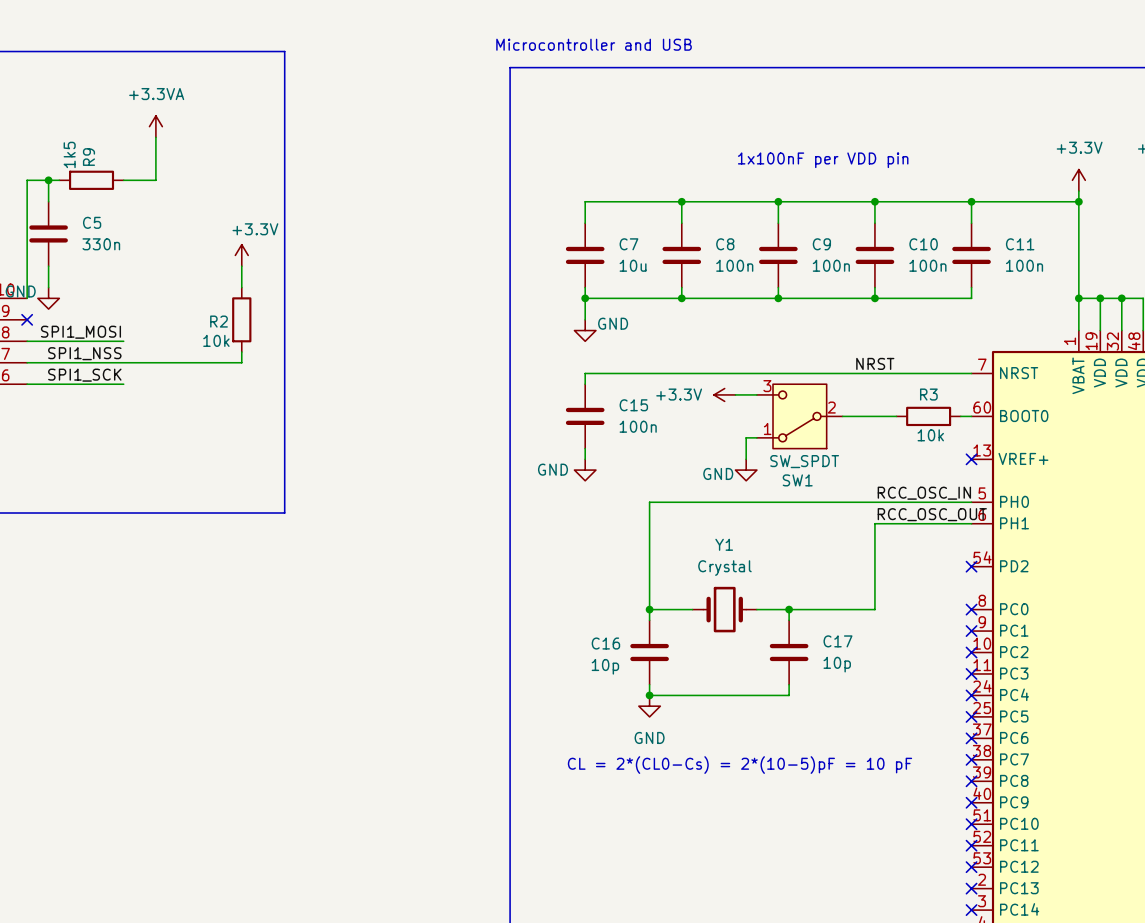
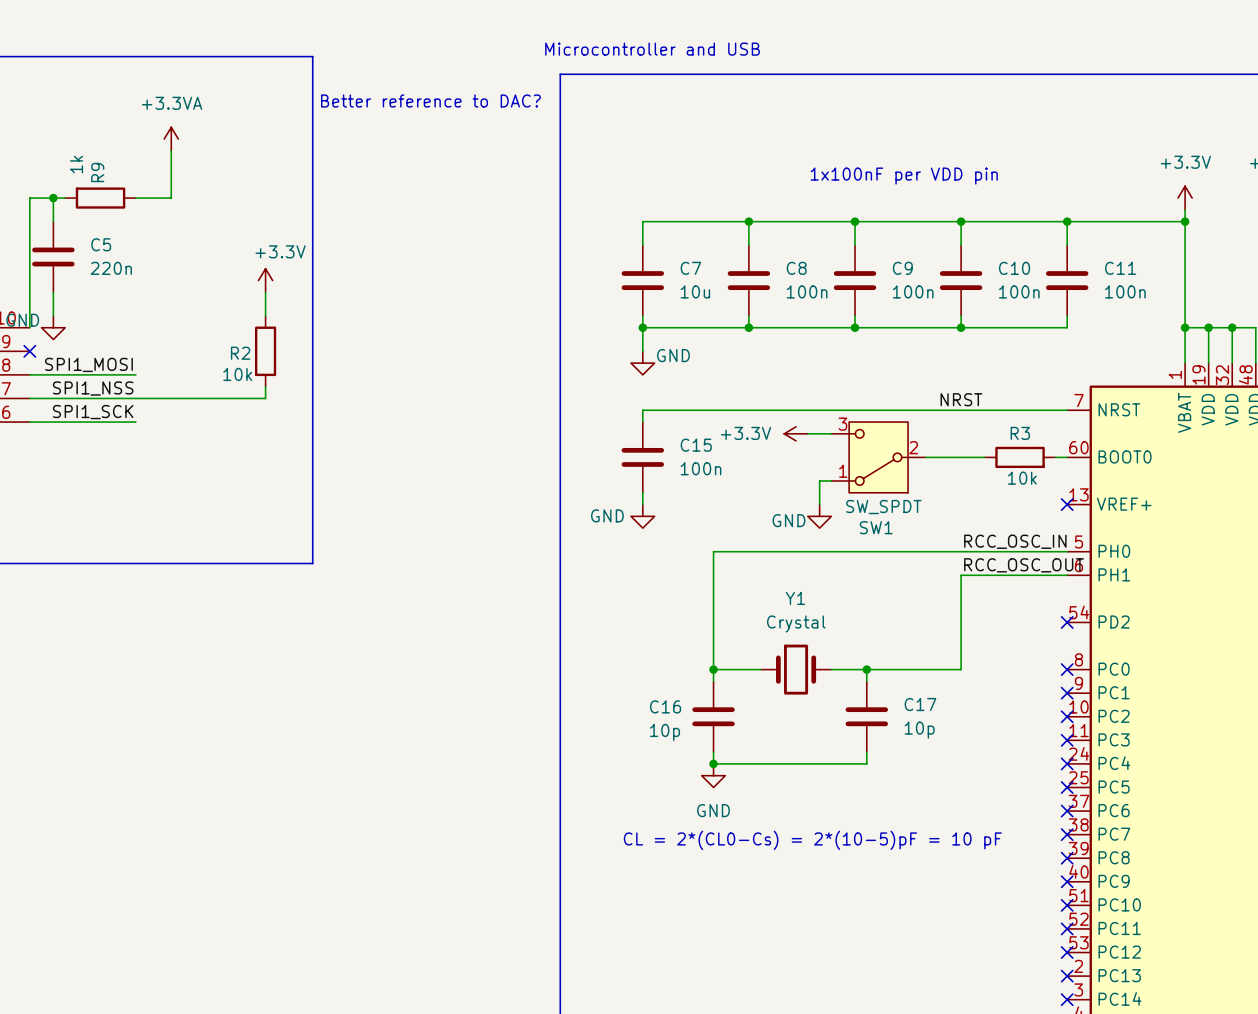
text: none -> Better reference to DAC? (430, 100)
R9 value: 1k5 (69, 154) -> 1k (76, 164)
C5 value: 330n (101, 244) -> 220n (111, 268)

